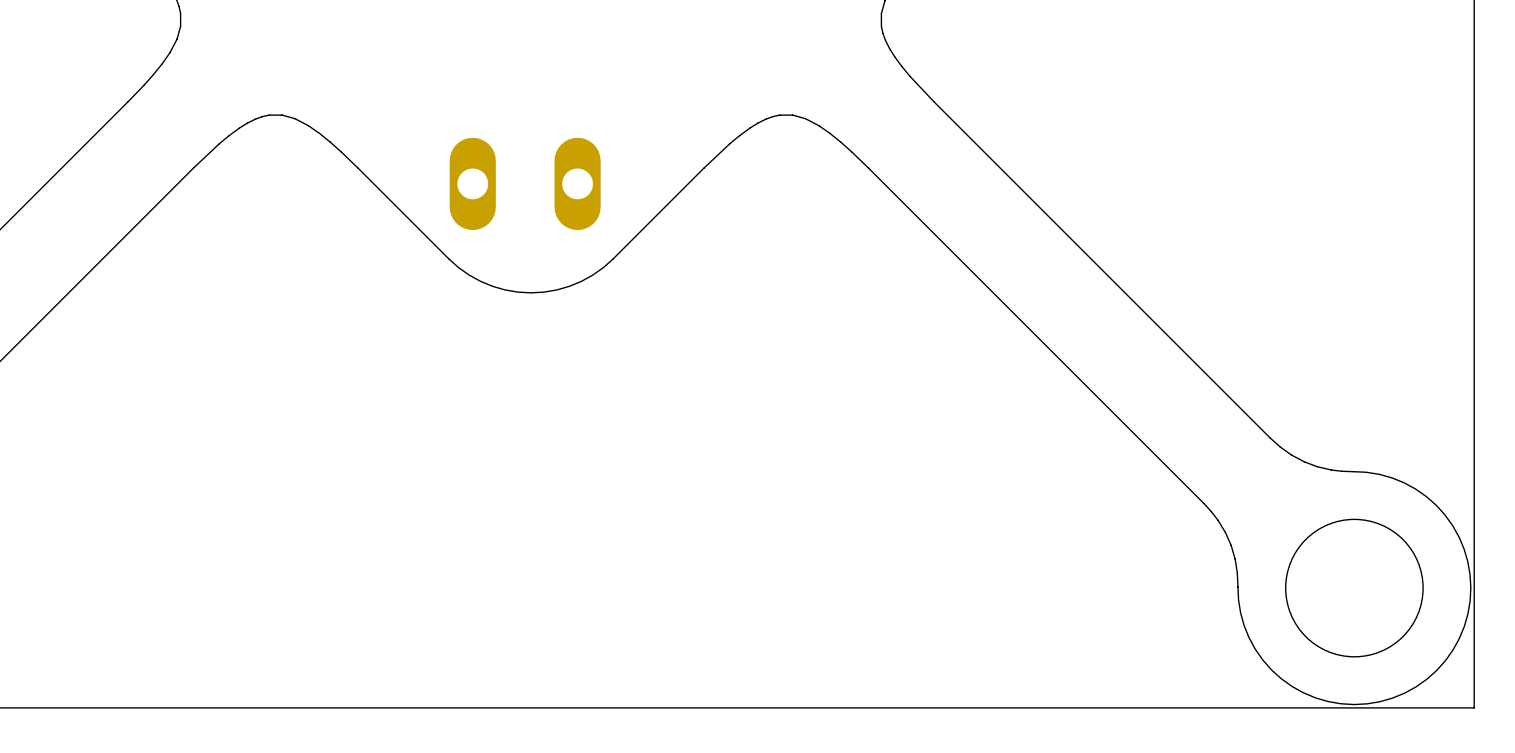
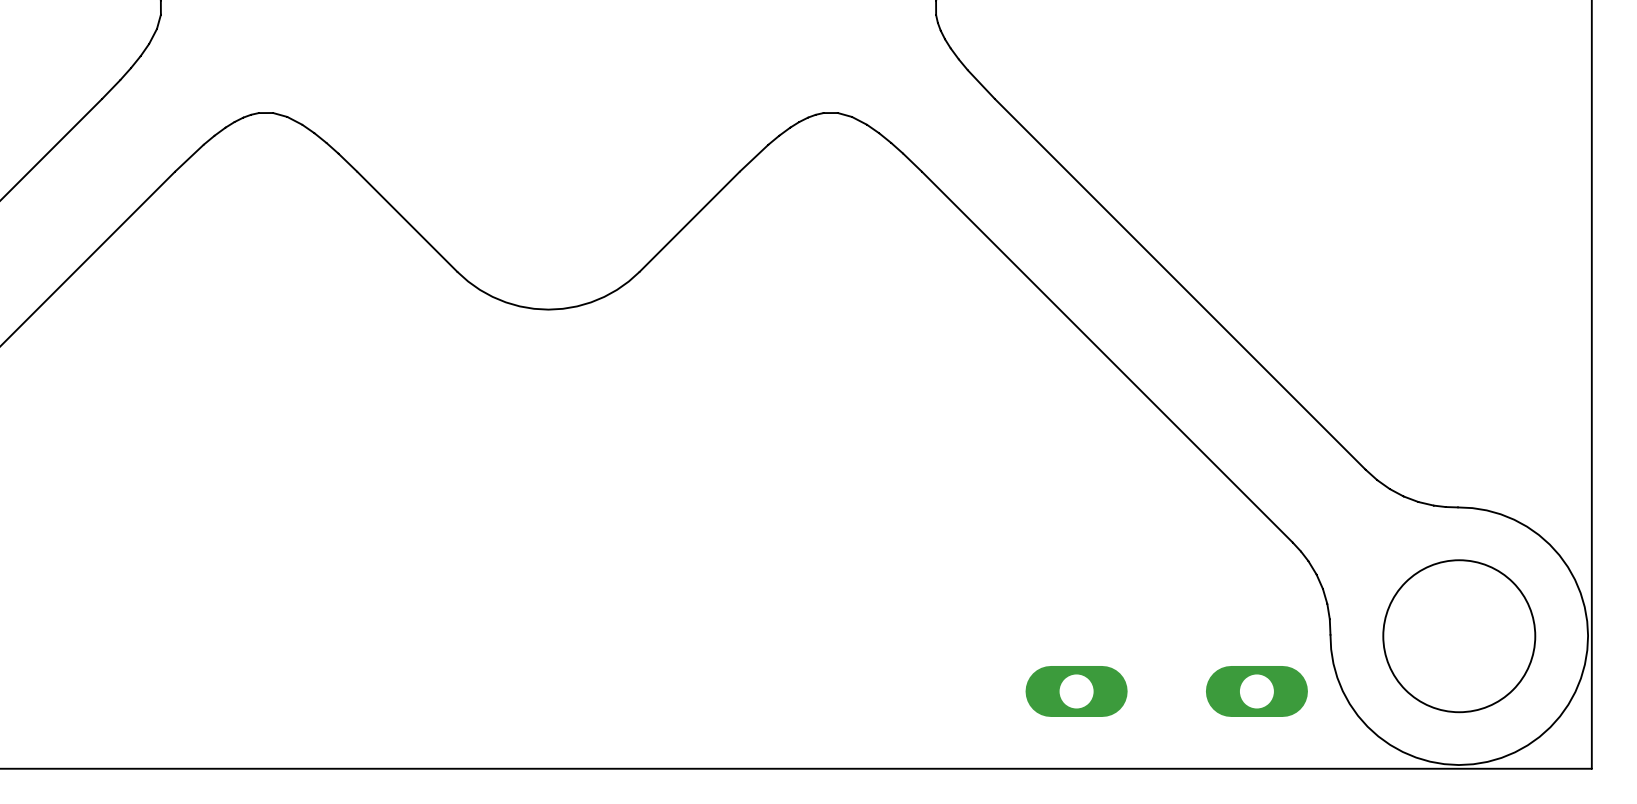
part: (472, 183) -> none
part: (577, 183) -> none
part: none -> (1076, 691)
part: none -> (1256, 691)

